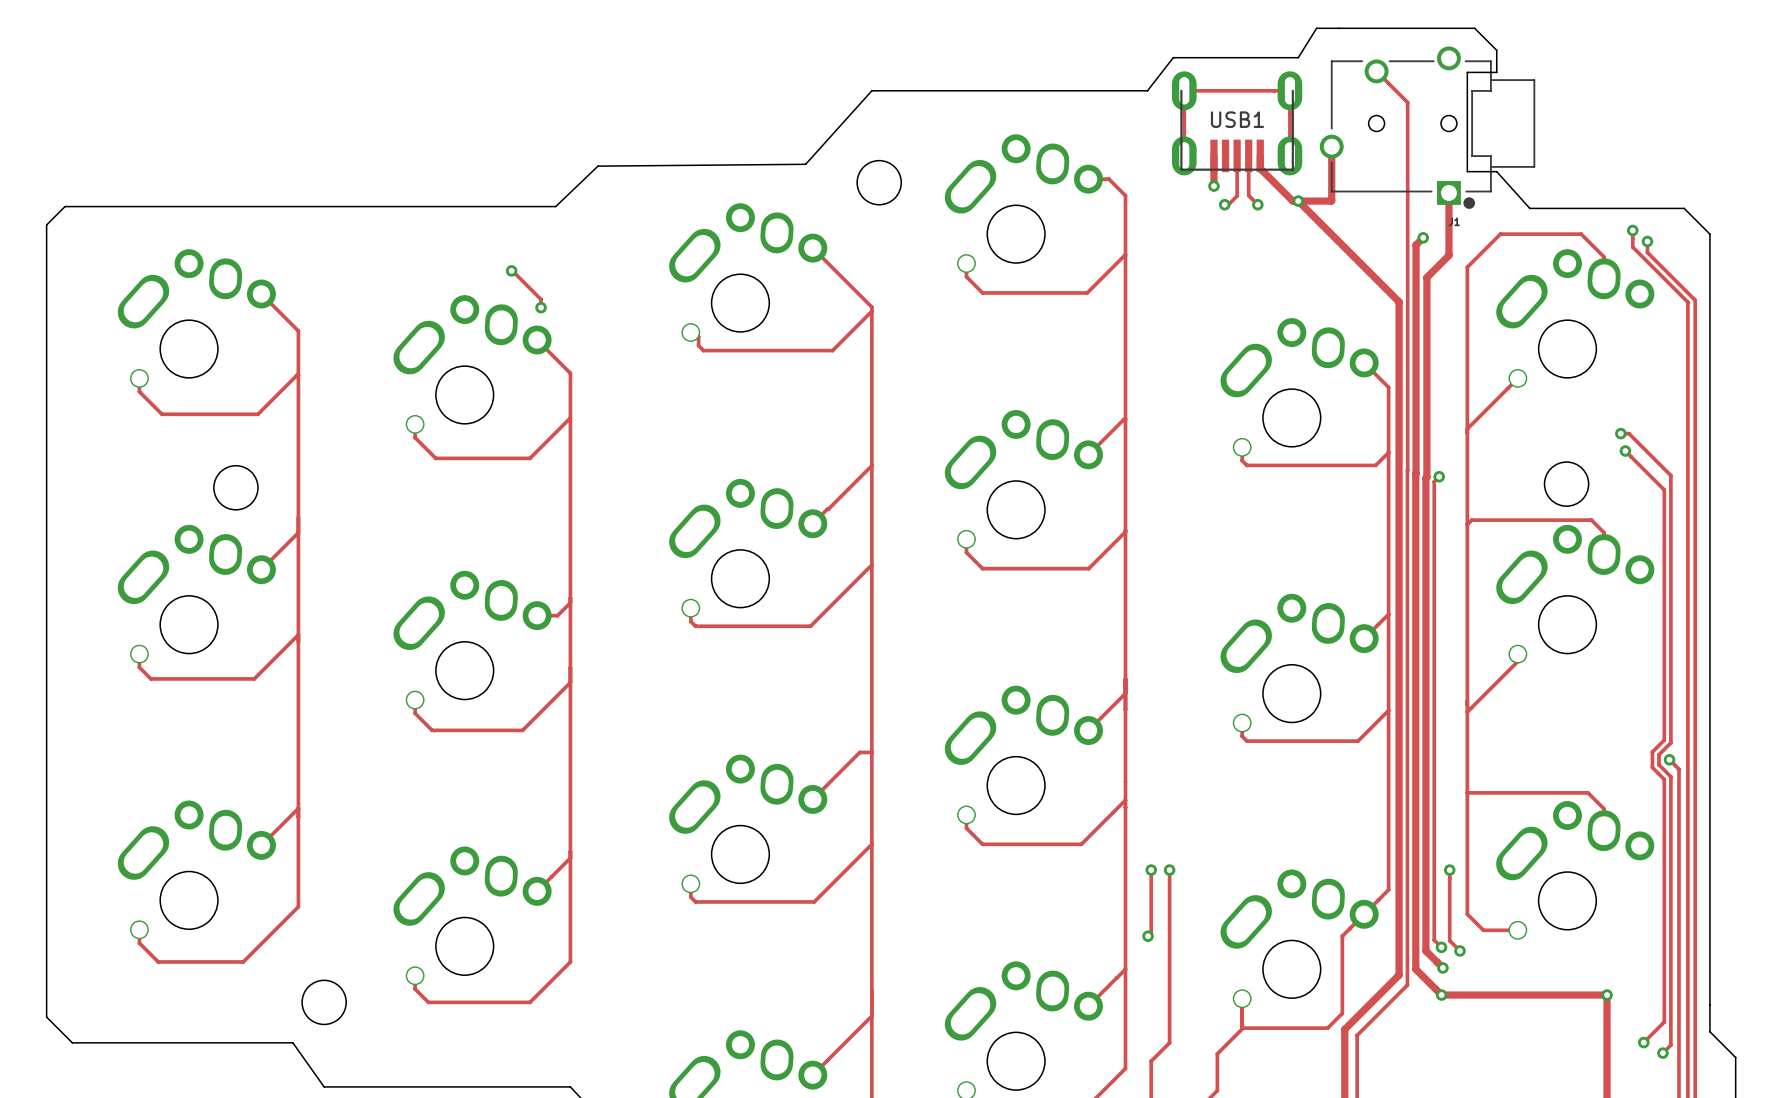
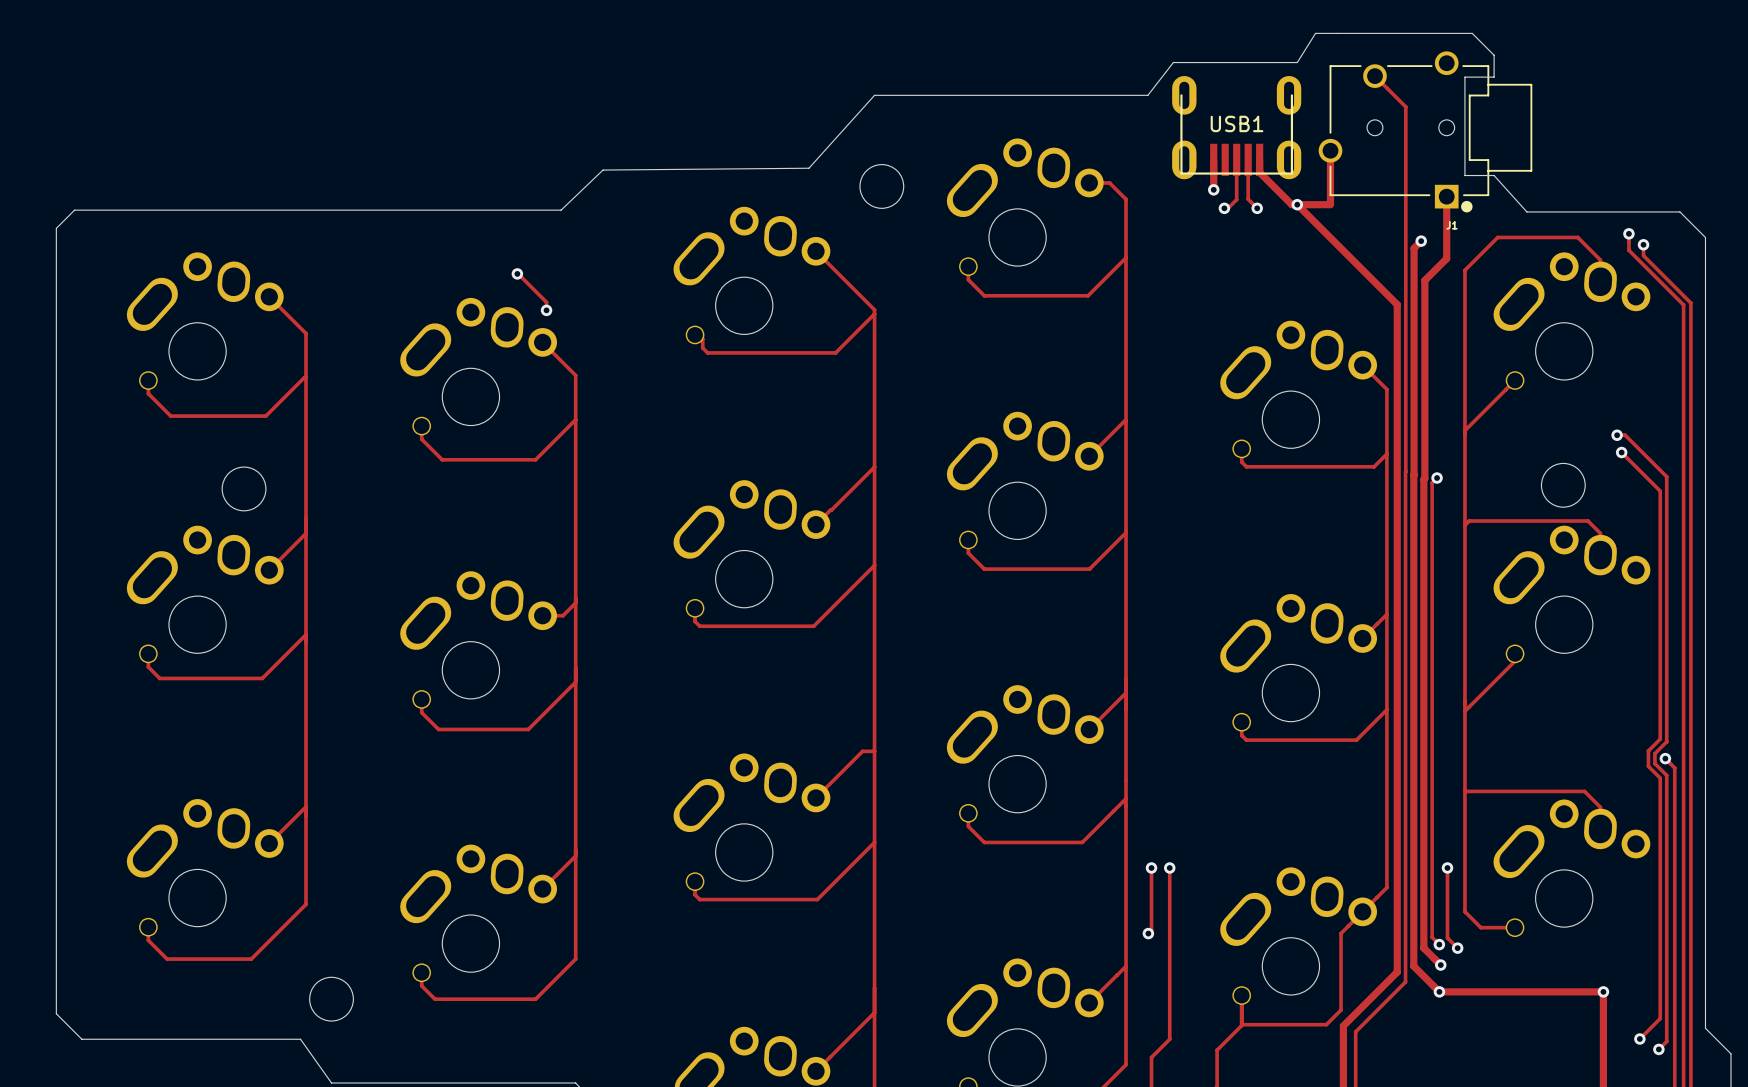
track: (1184, 155) (1184, 90) (1289, 90) (1289, 155) -> none

